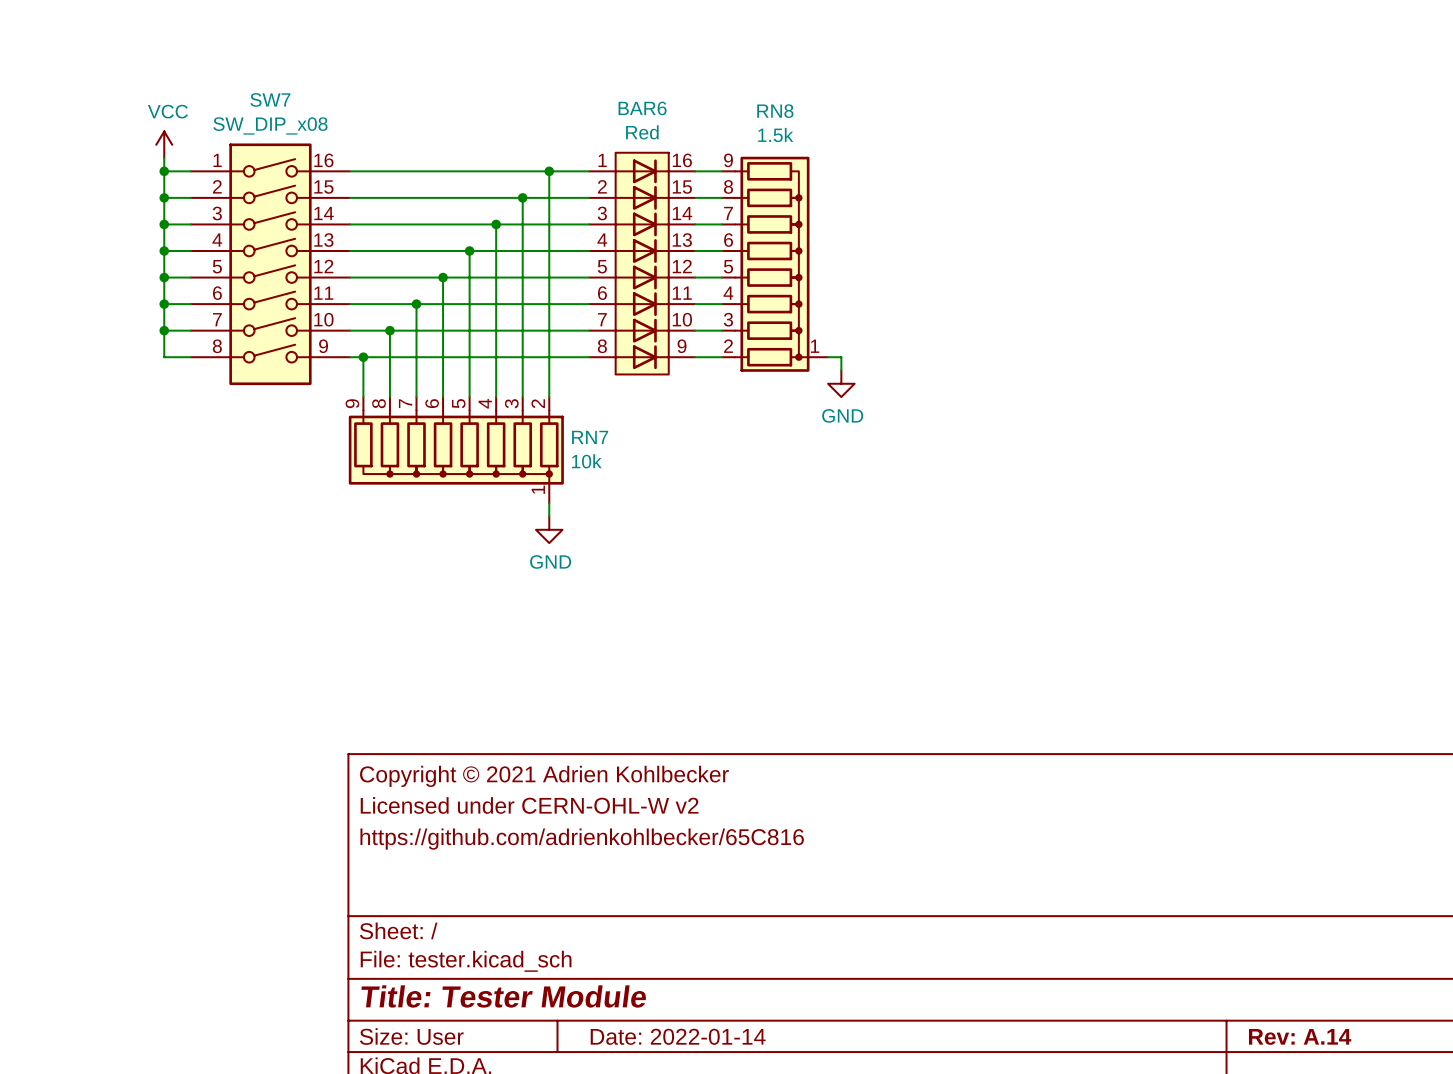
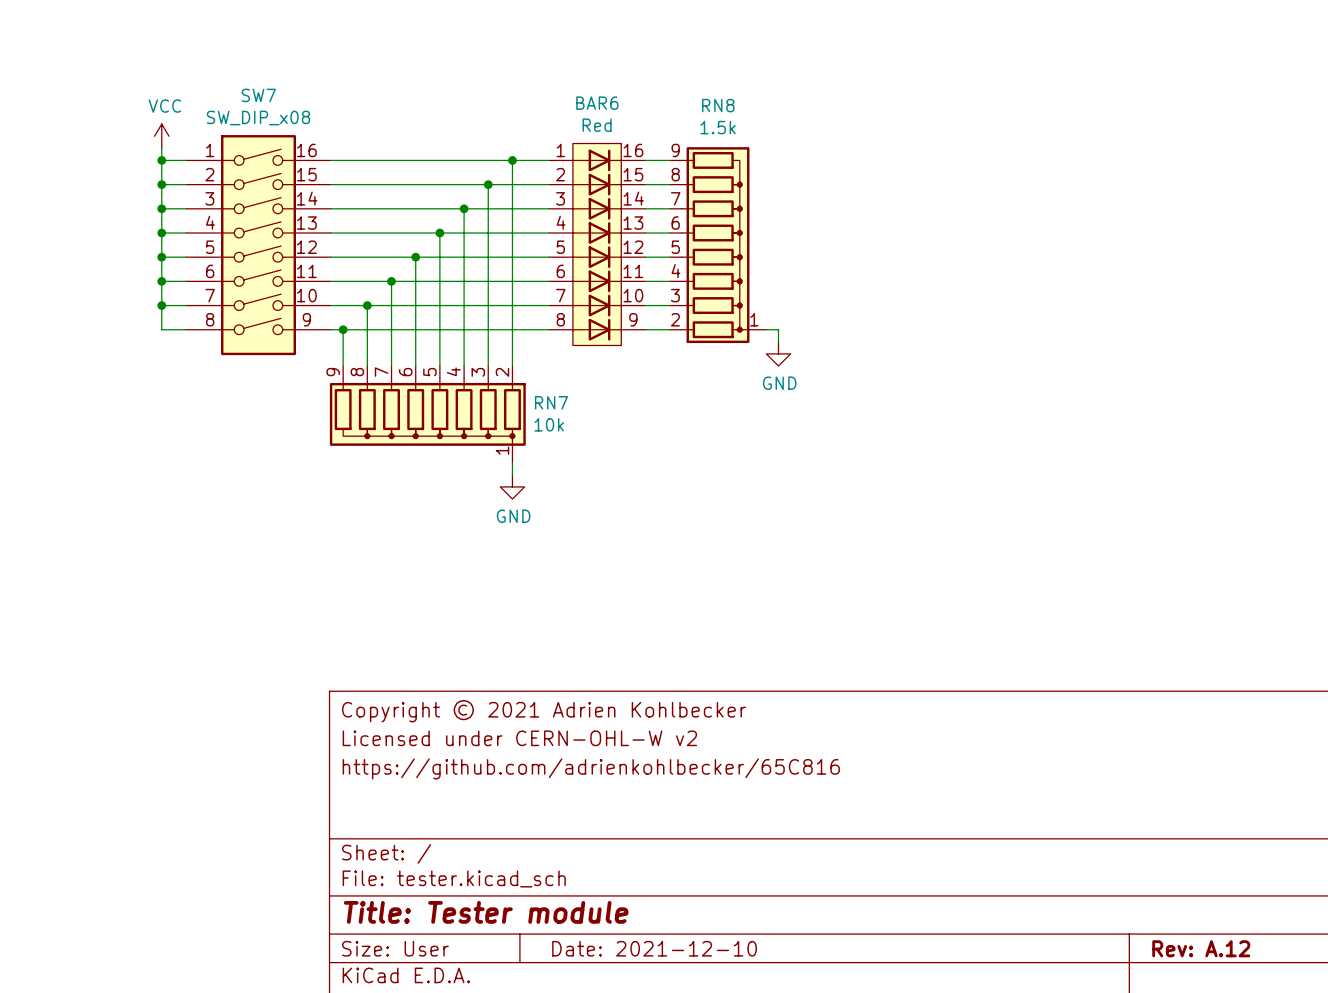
title block: Title: Tester Module (503, 996) -> Title: Tester module (486, 912)
title block: Date: 2022-01-14 (678, 1036) -> Date: 2021-12-10 (654, 948)
title block: Rev: A.14 (1300, 1036) -> Rev: A.12 (1201, 948)

